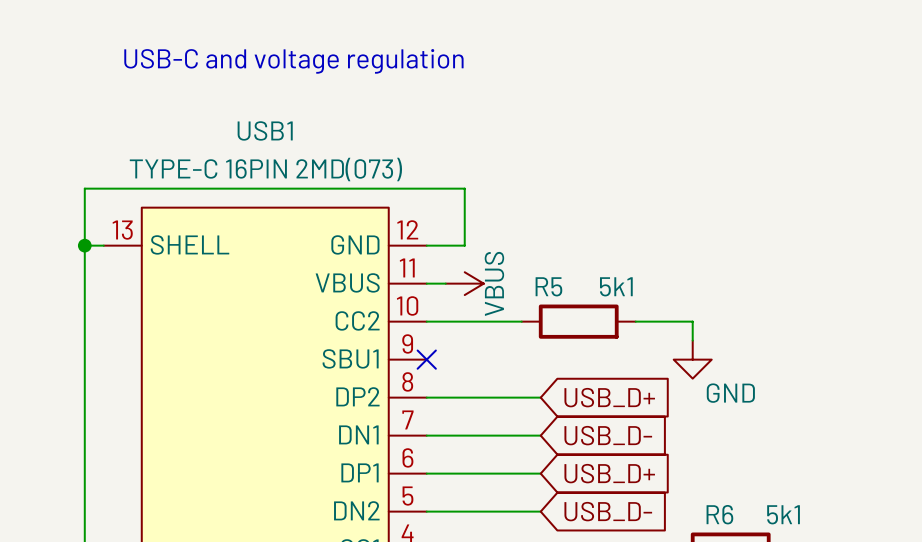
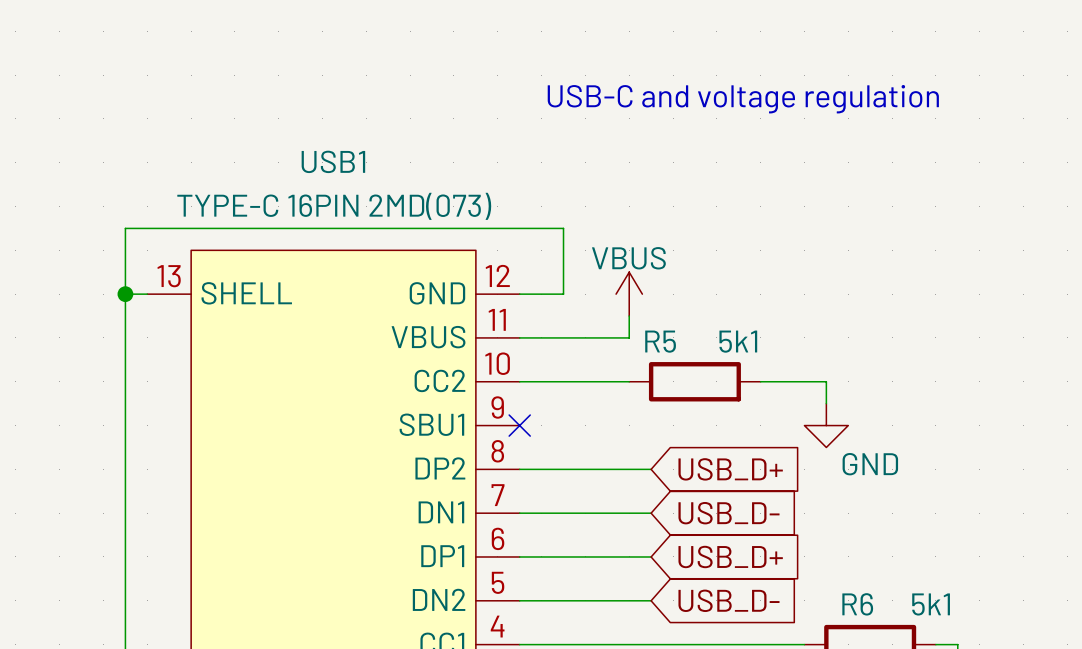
text position: USB-C and voltage regulation (293, 61) -> USB-C and voltage regulation (743, 99)
wire: none -> (629, 316) (629, 337) (541, 337)
power symbol rotation: 0° (464, 283) -> 90° counterclockwise (629, 294)
power symbol position: VBUS (464, 283) -> VBUS (629, 294)

